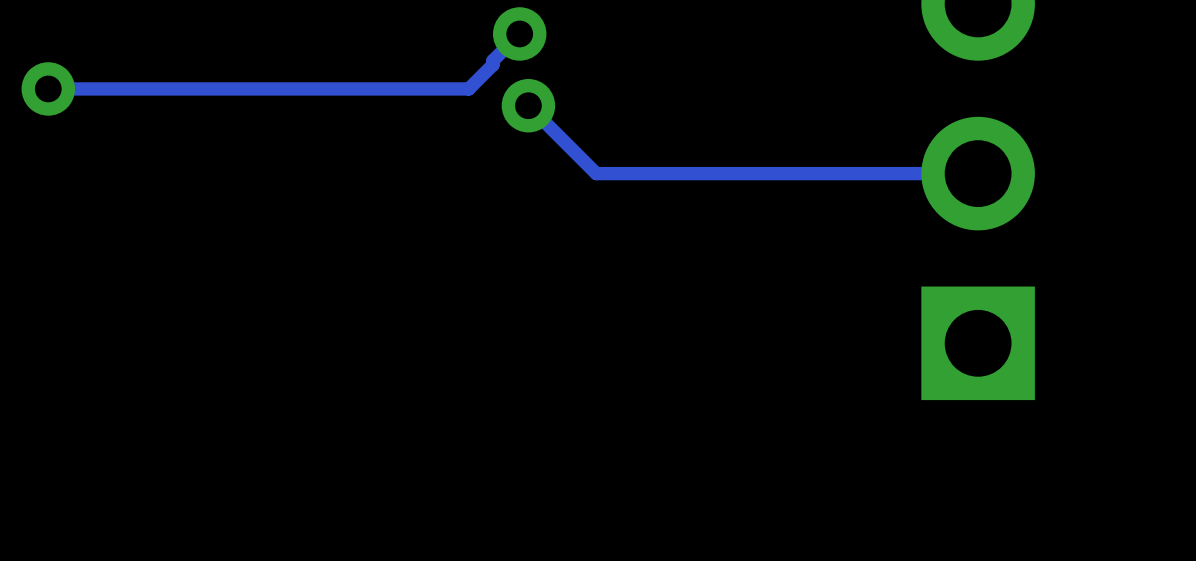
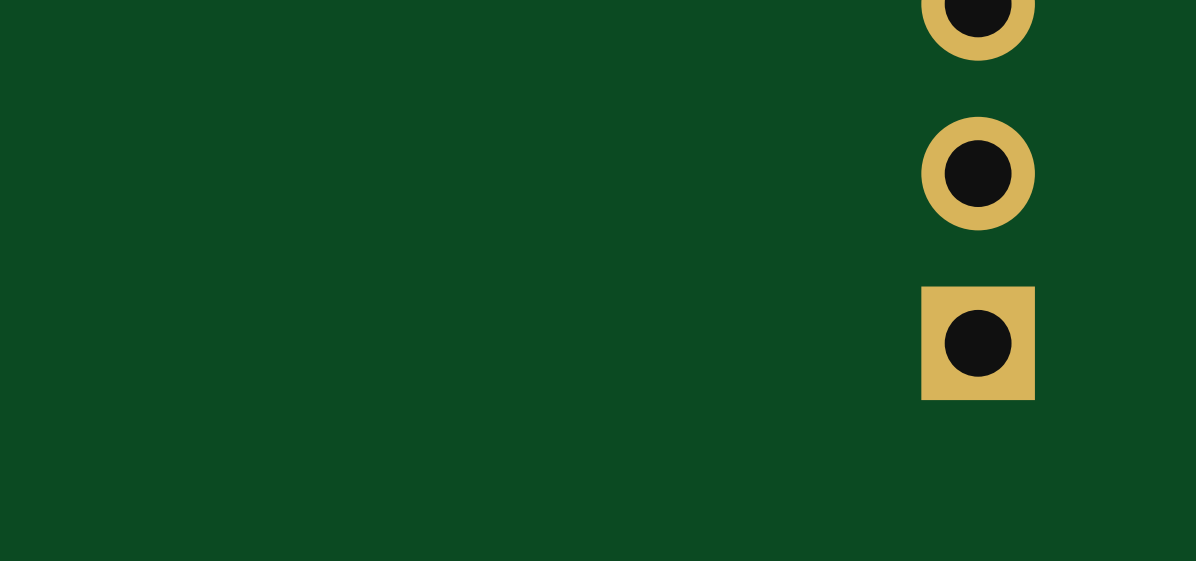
track: (519, 33) (468, 88) (48, 88) -> none
via: (519, 33) -> none
via: (48, 88) -> none
track: (528, 105) (596, 173) (978, 173) -> none
via: (528, 105) -> none

